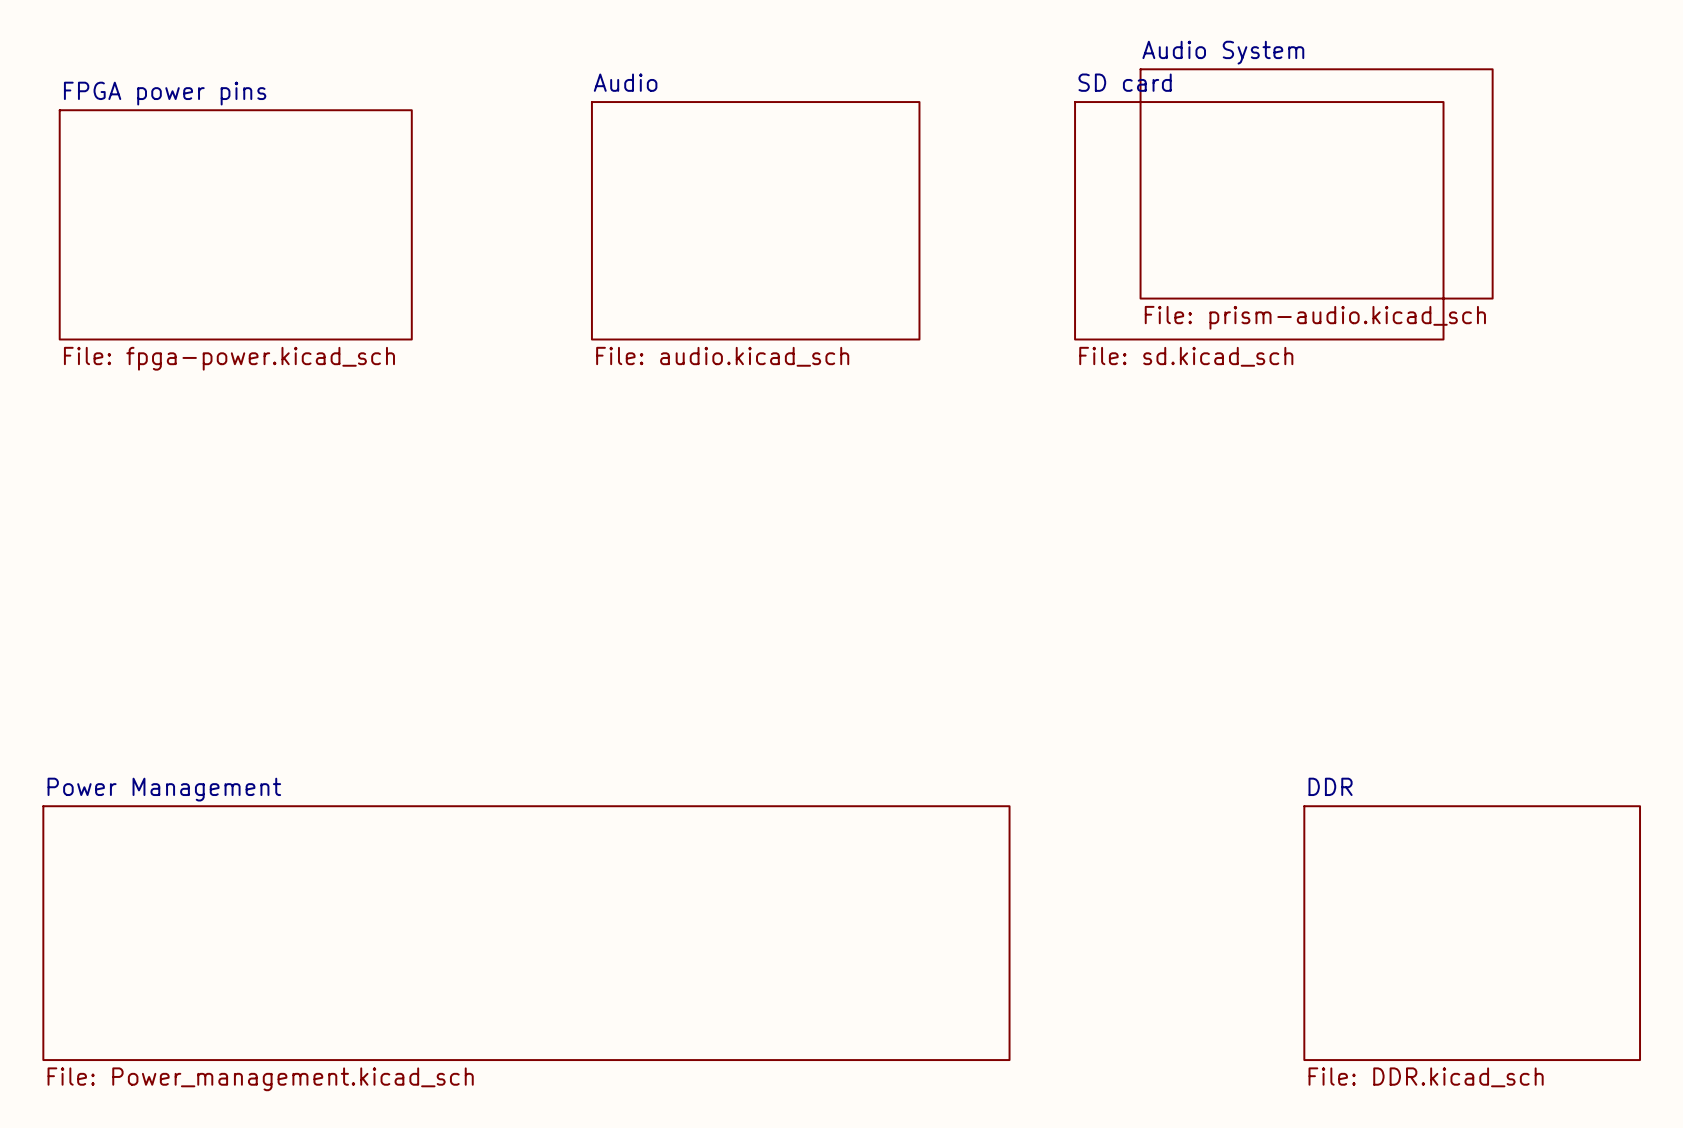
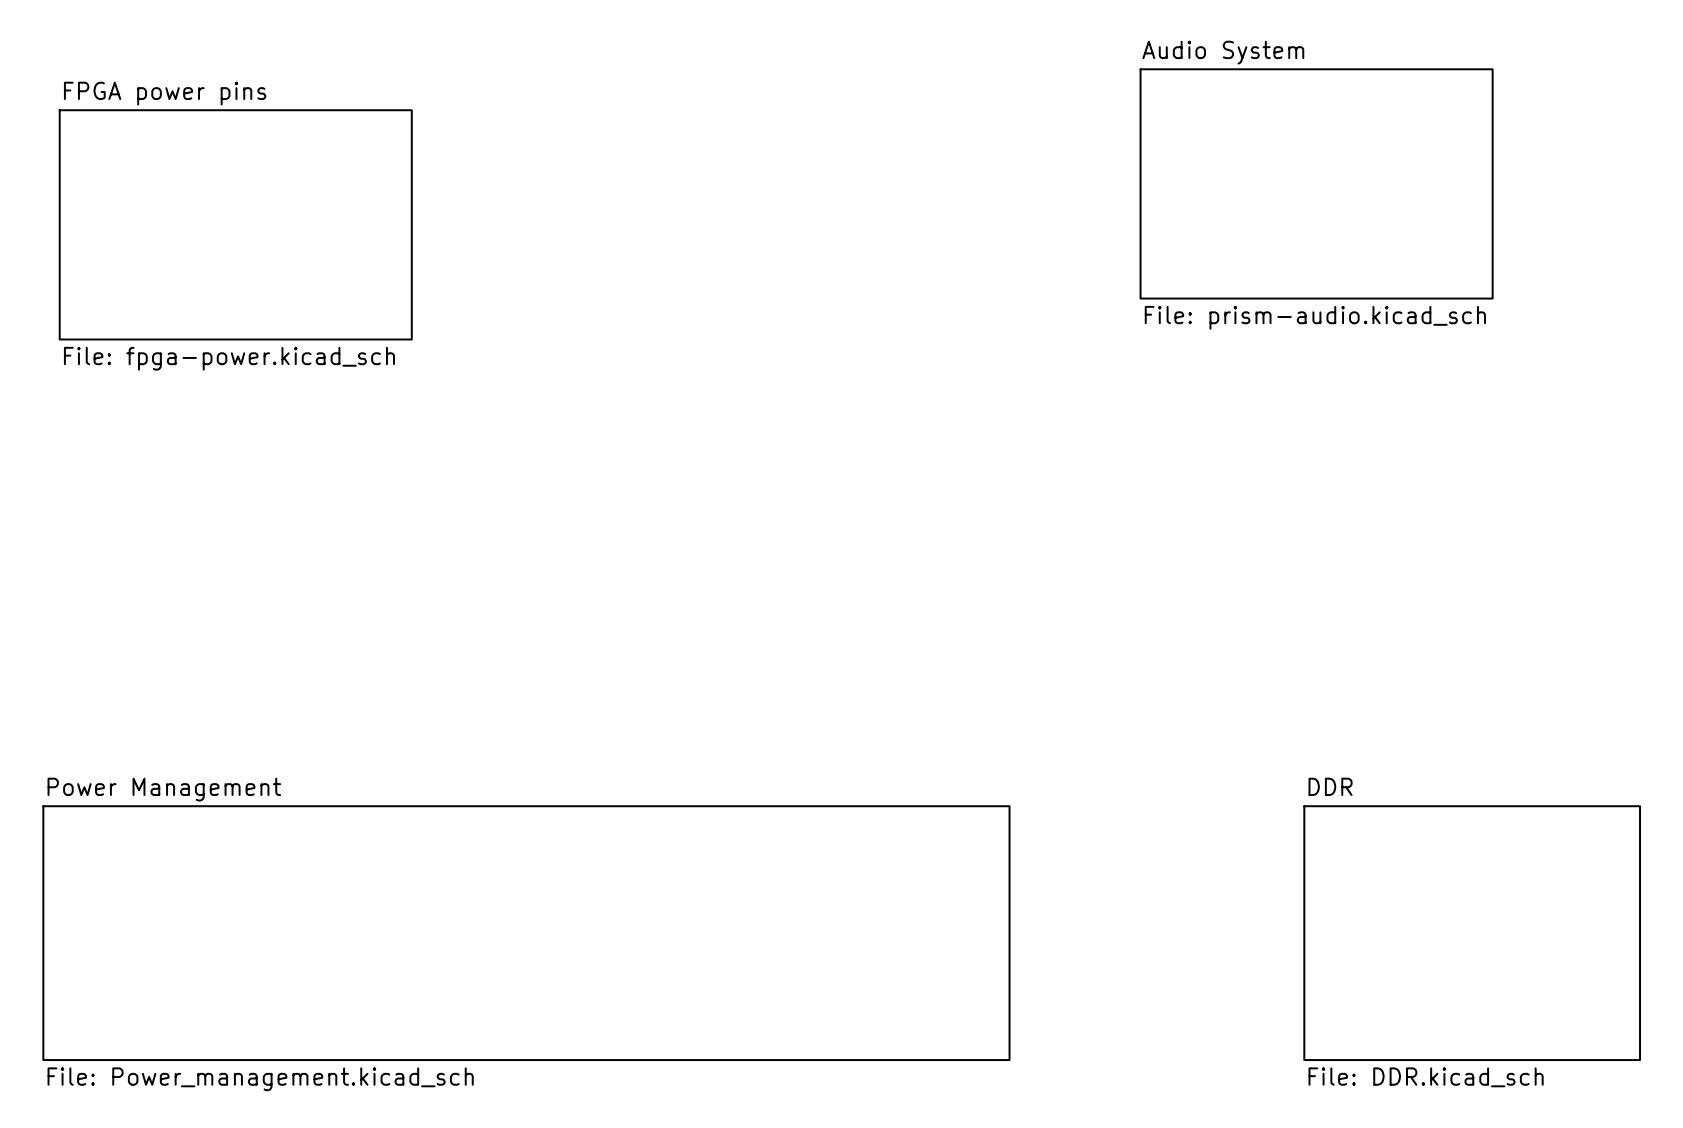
sheet Audio: File: audio.kicad_sch (755, 220) -> none
sheet SD card: File: sd.kicad_sch (1259, 220) -> none

